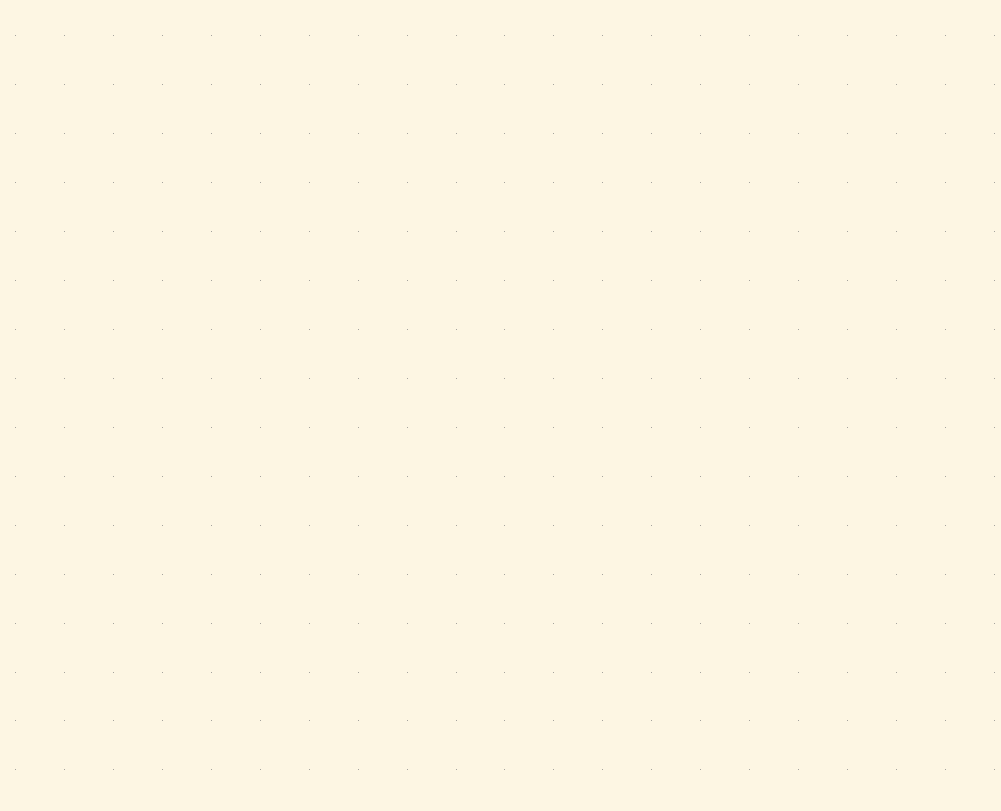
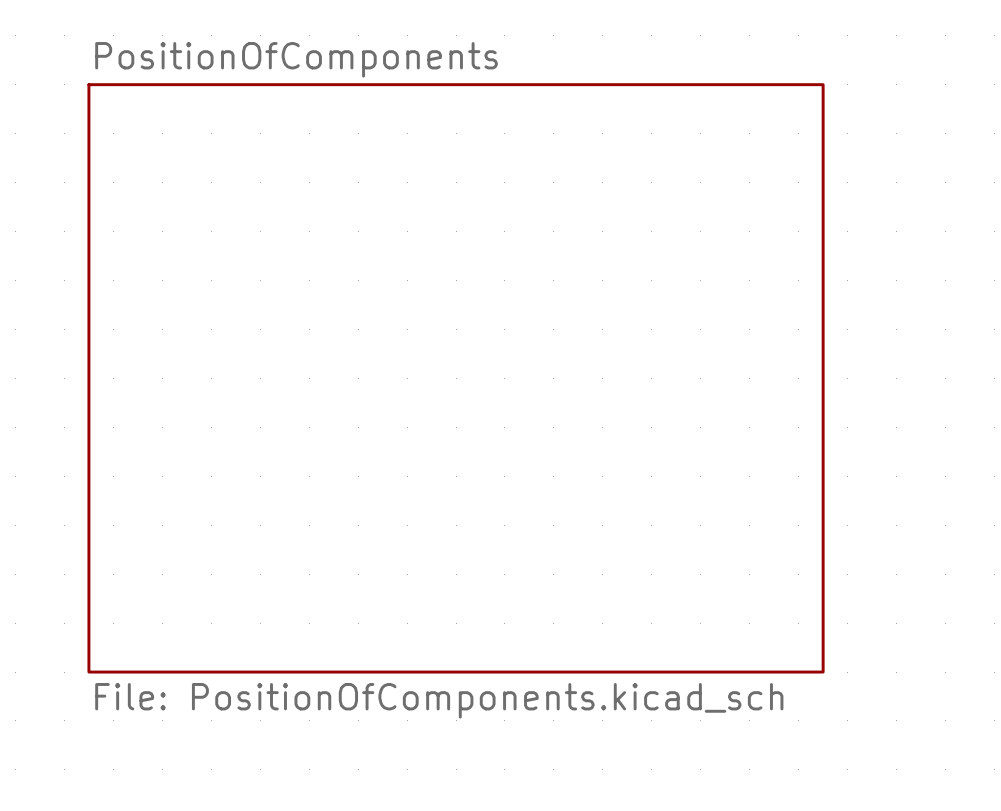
sheet PositionOfComponents: none -> File: PositionOfComponents.kicad_sch (456, 378)

